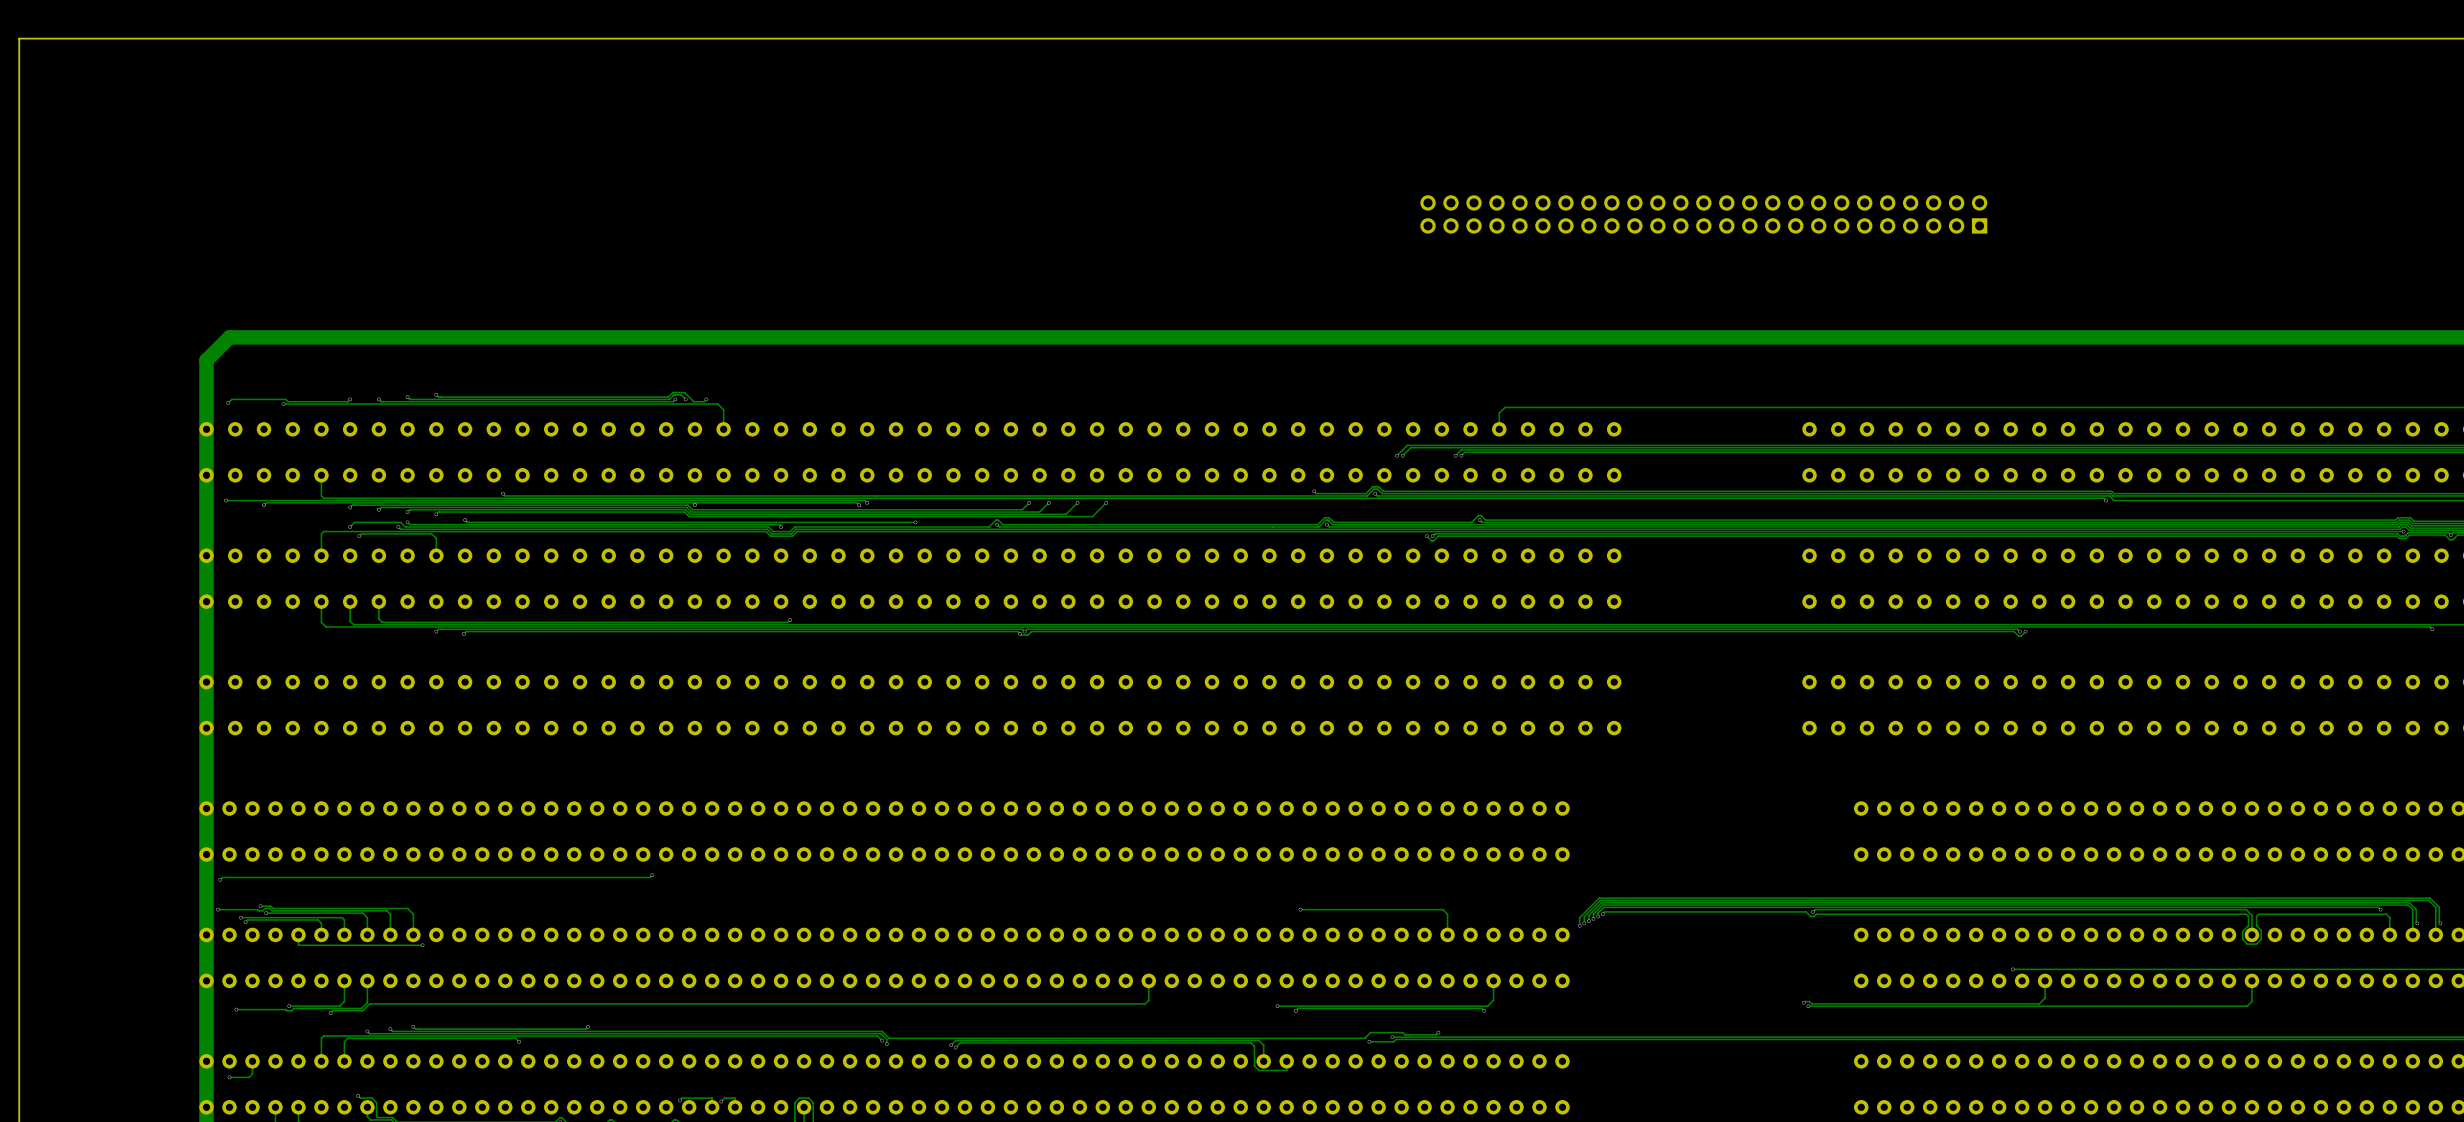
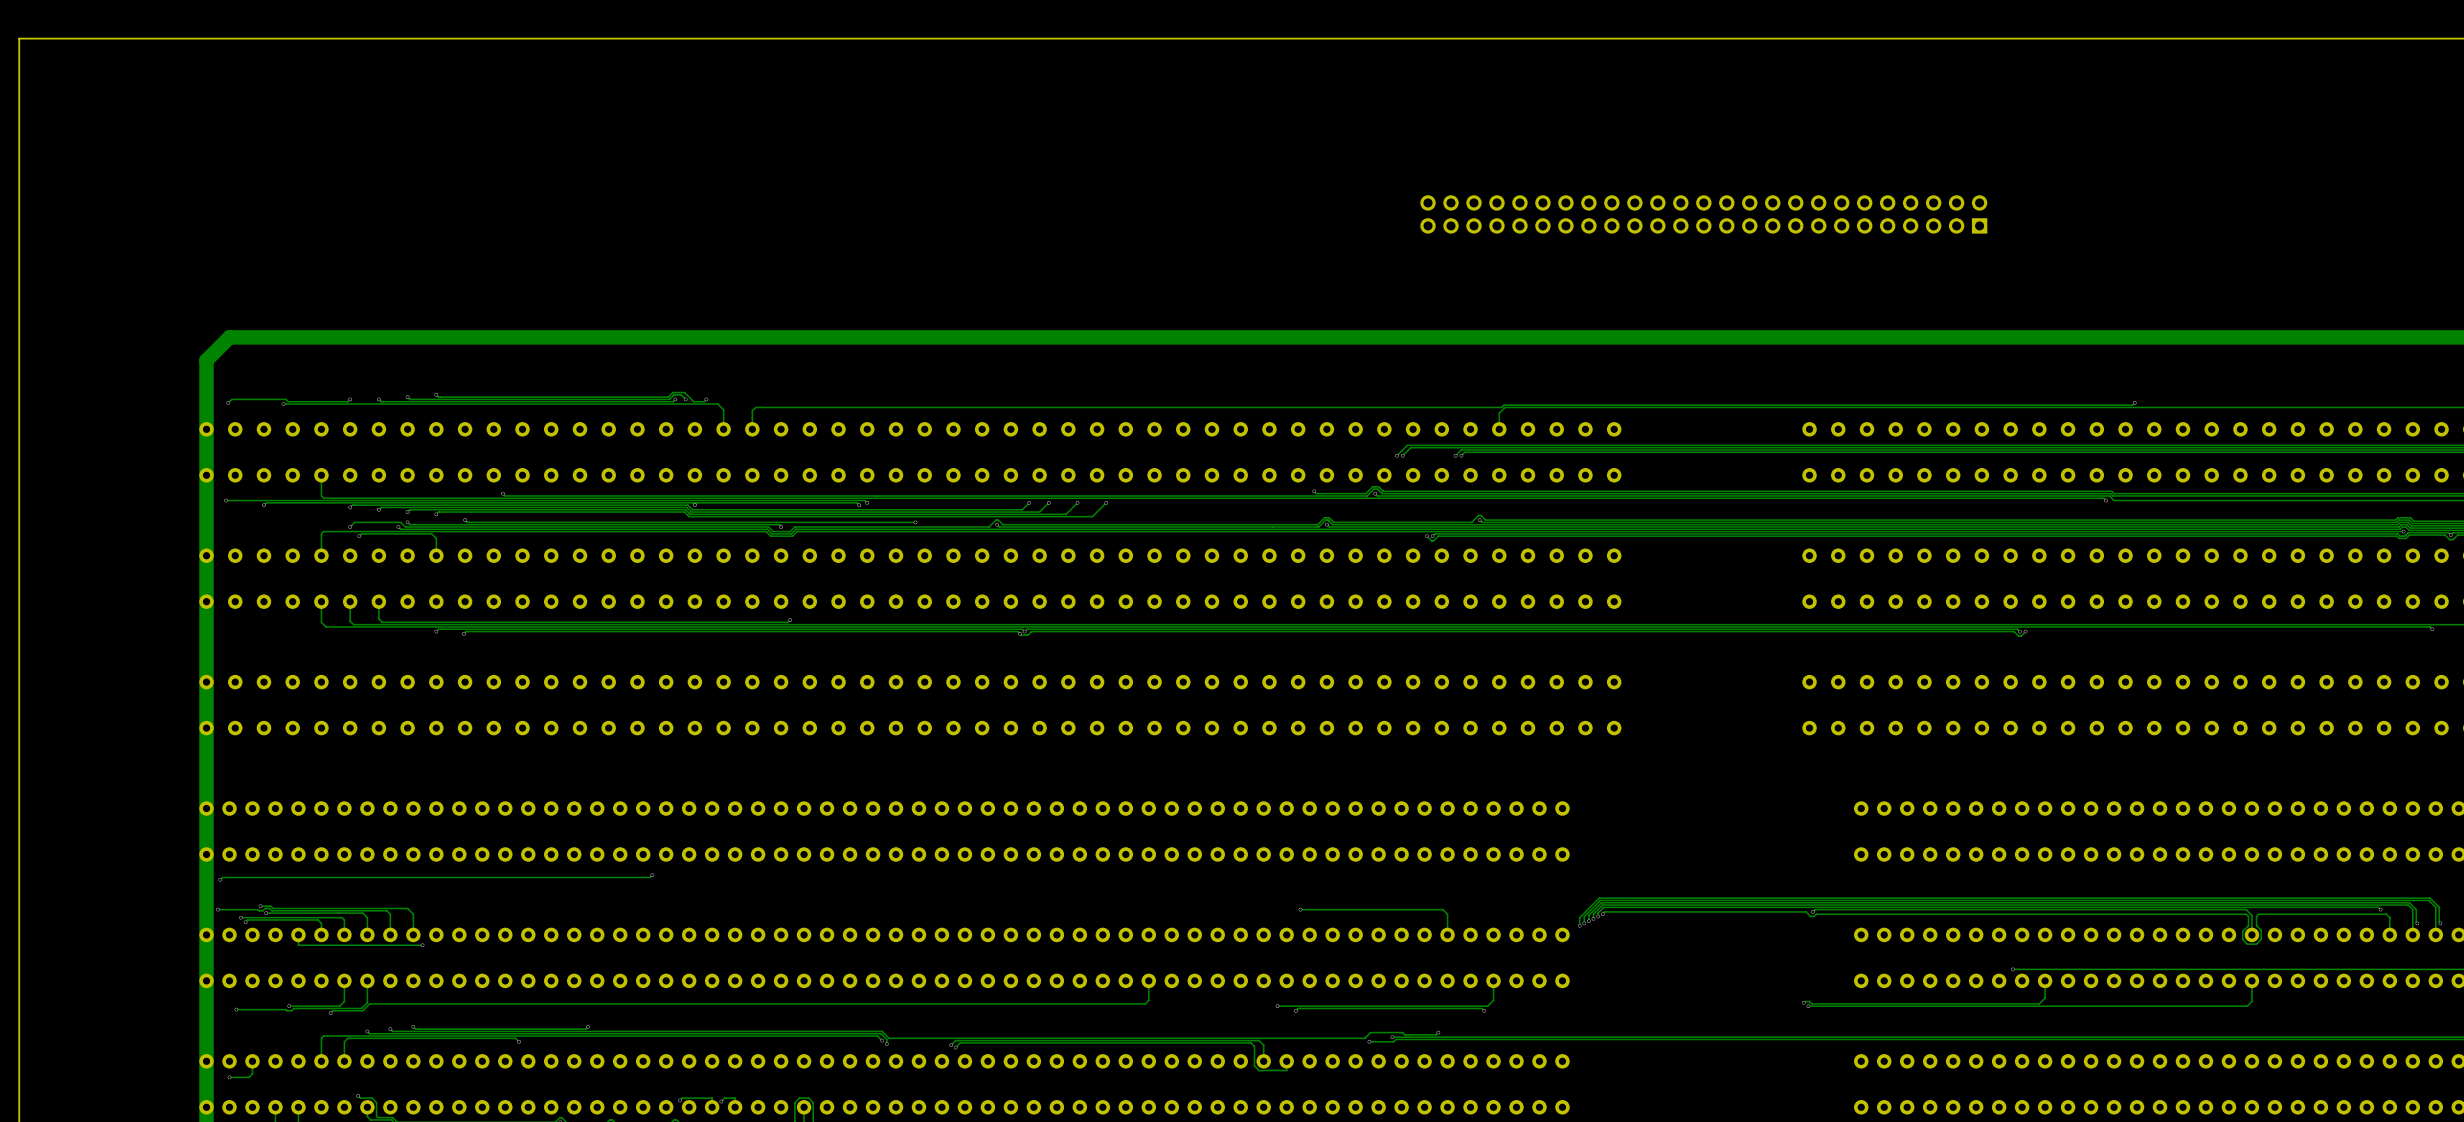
track: none -> (2134, 402) (2132, 405) (1503, 405) (1501, 407) (755, 407) (752, 410) (752, 429)
via: none -> (2134, 402)

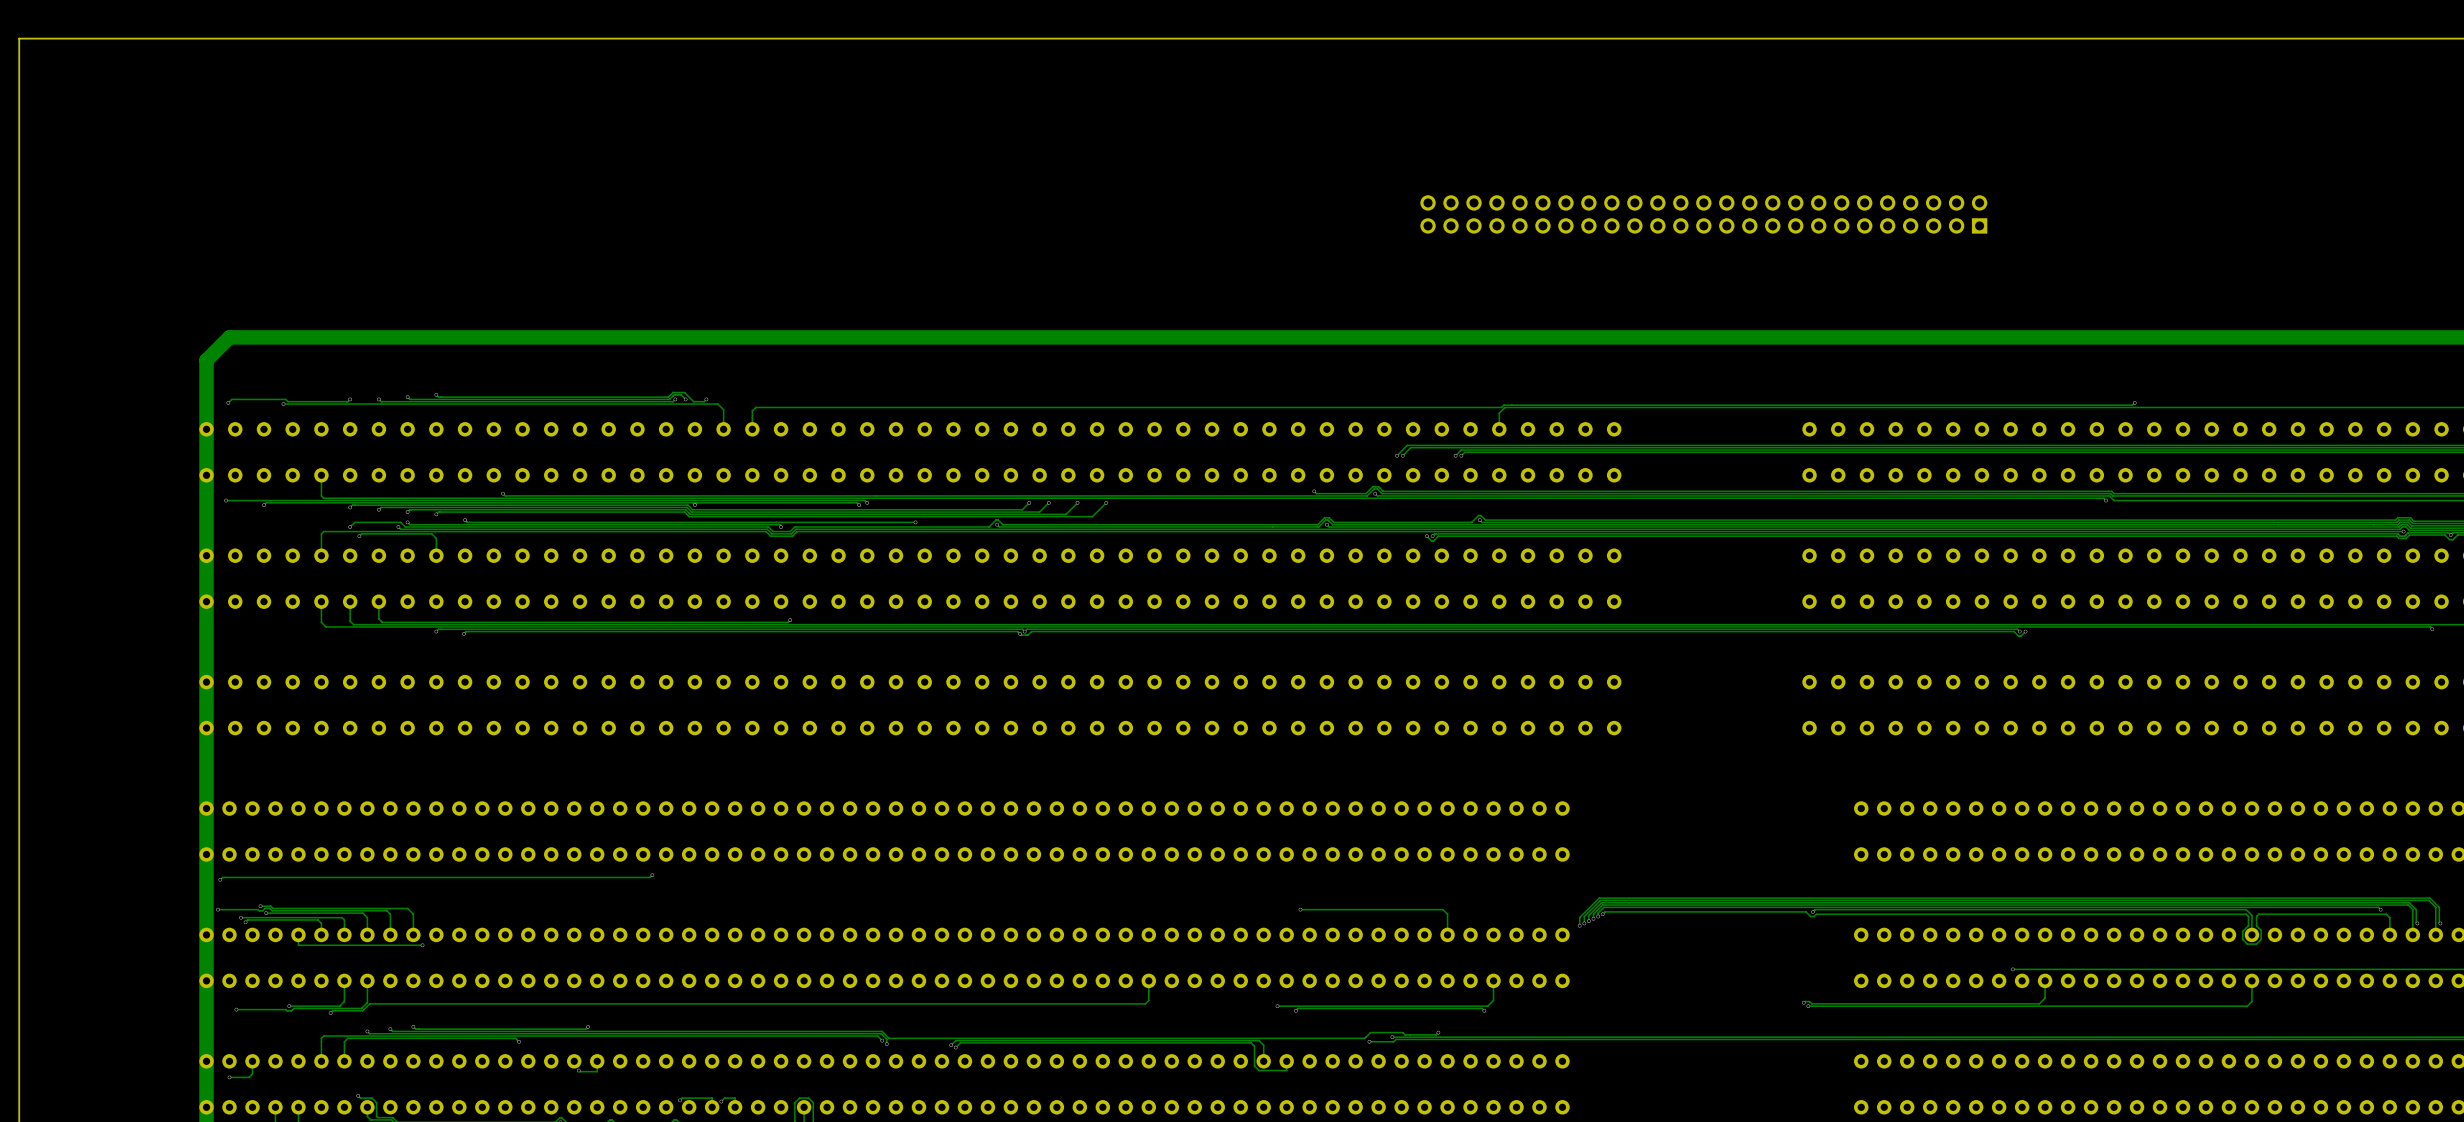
track: none -> (597, 1061) (597, 1071) (578, 1070)
via: none -> (578, 1070)

